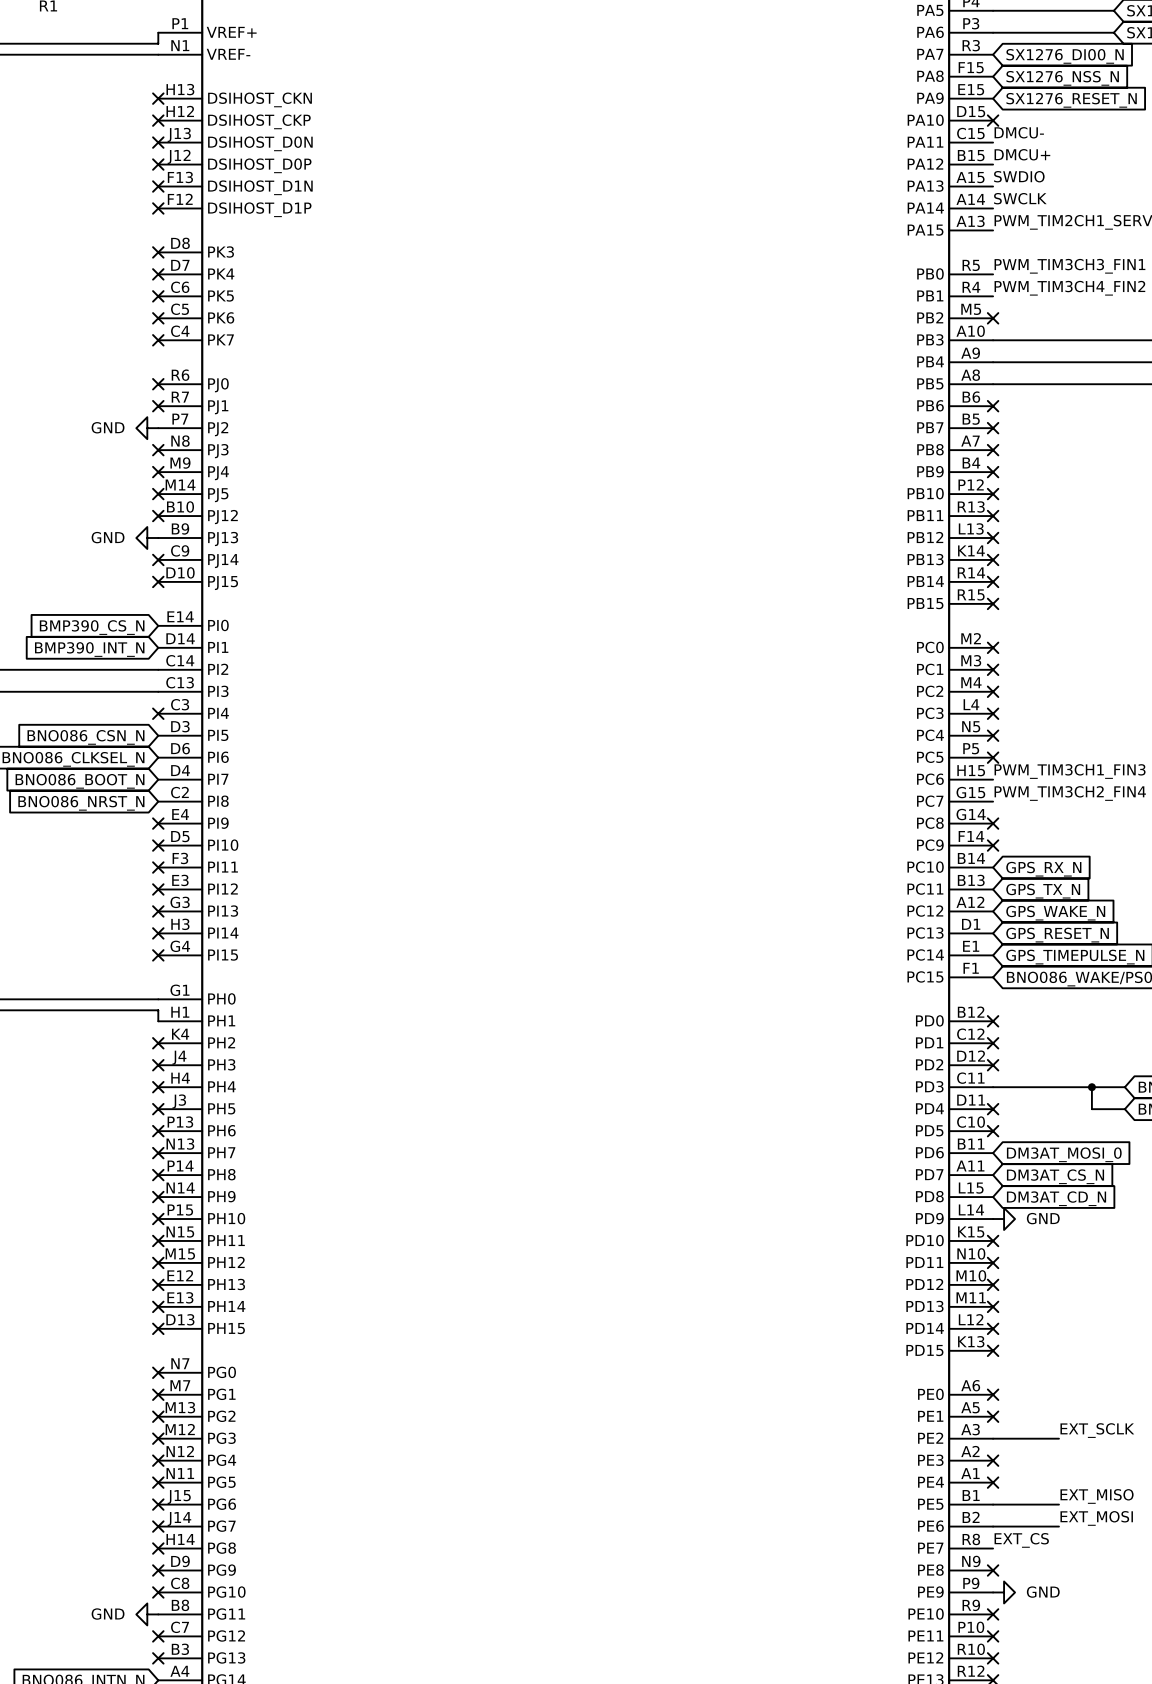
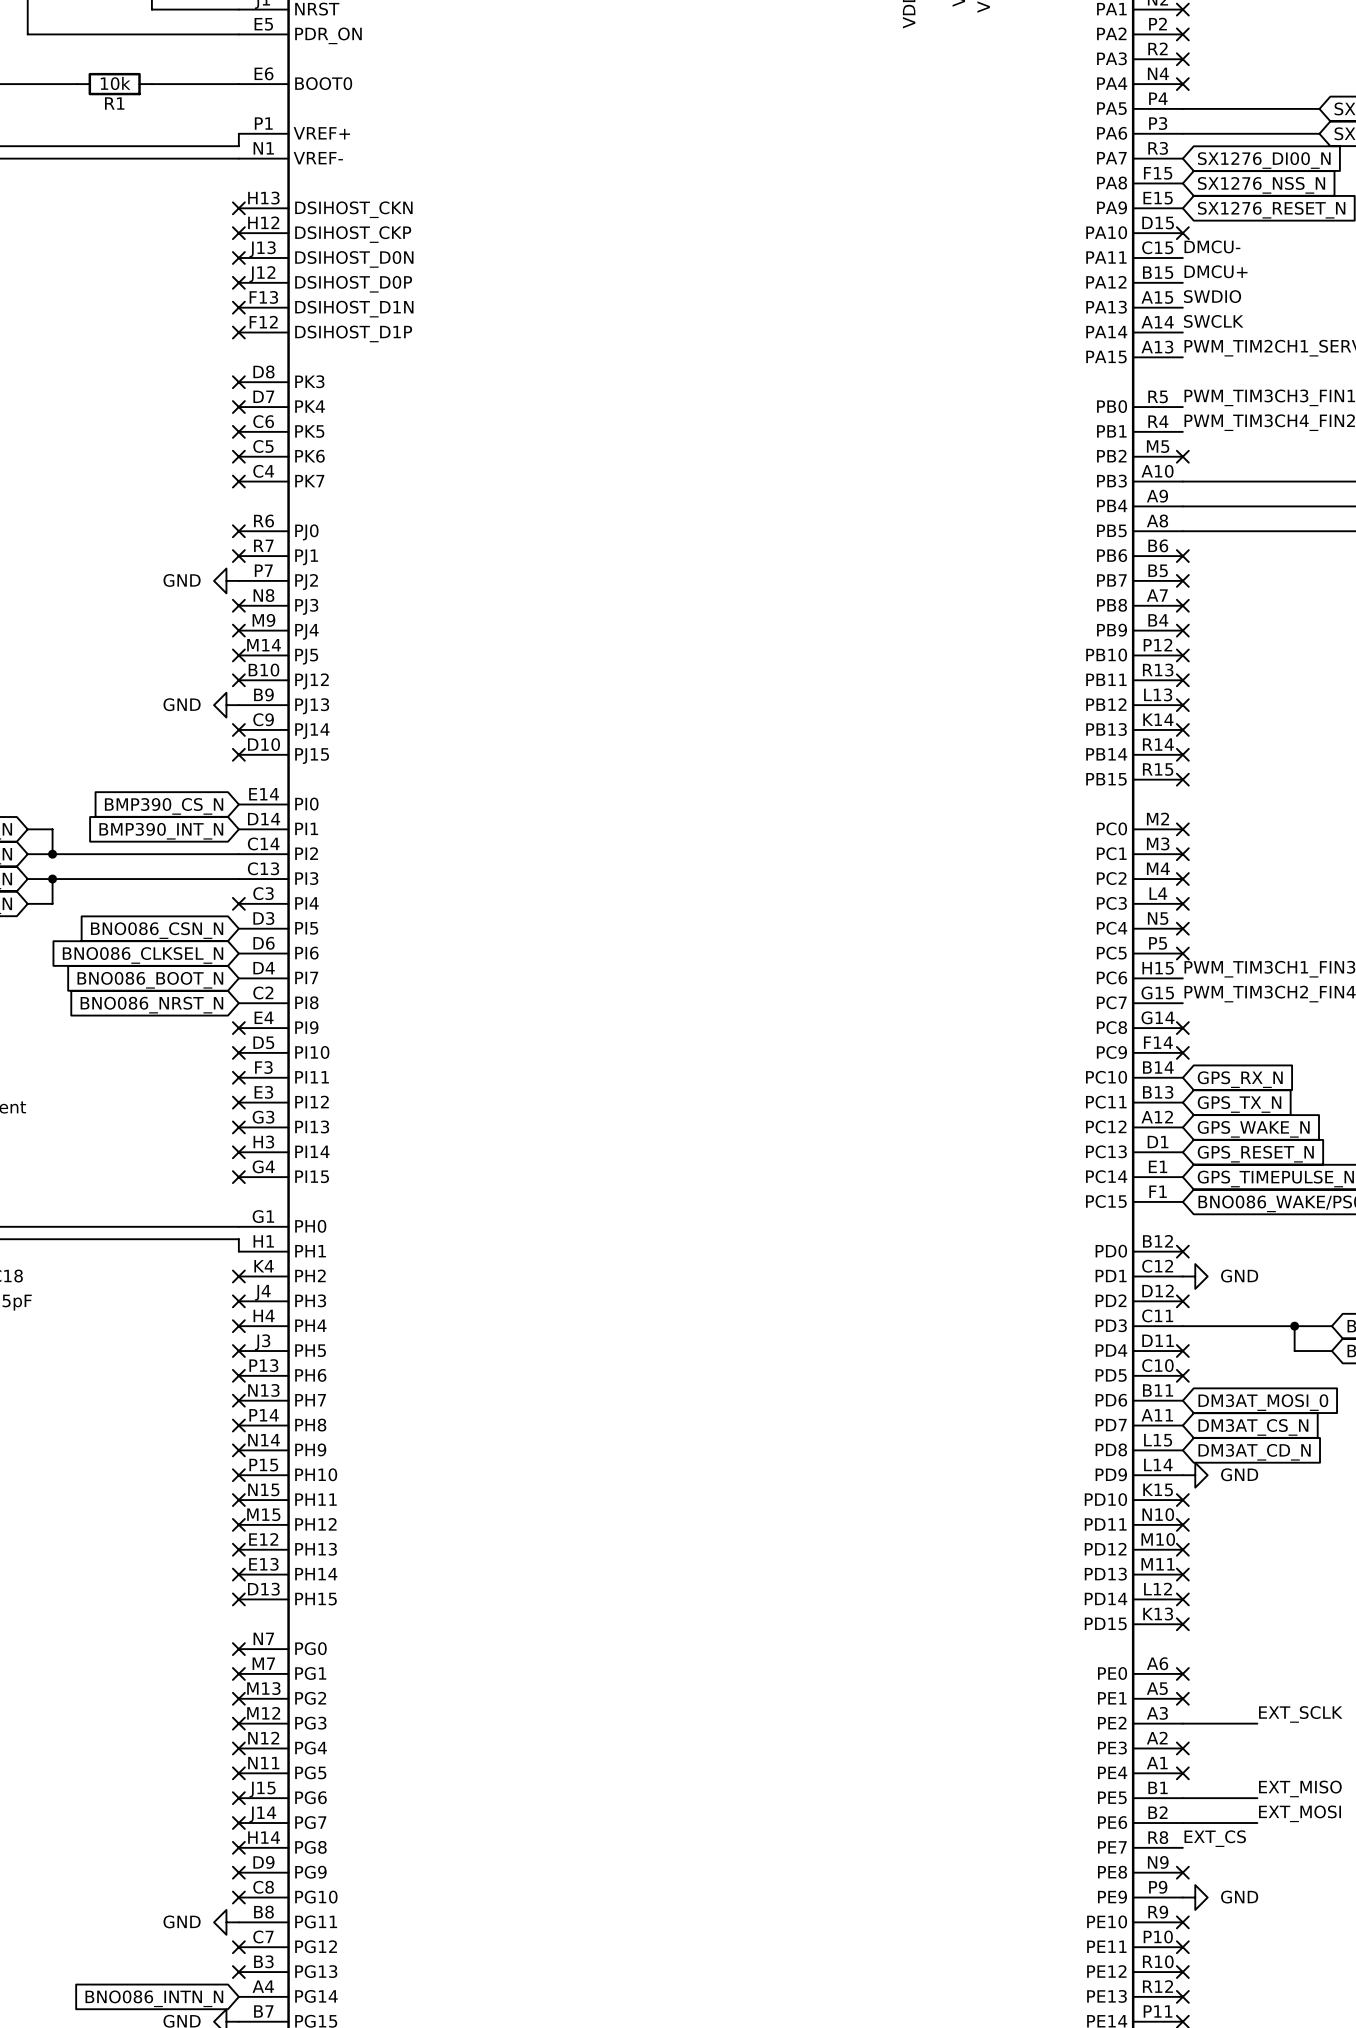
no-connect mark: (993, 1043) -> none
power symbol: none -> GND (1195, 1276)

